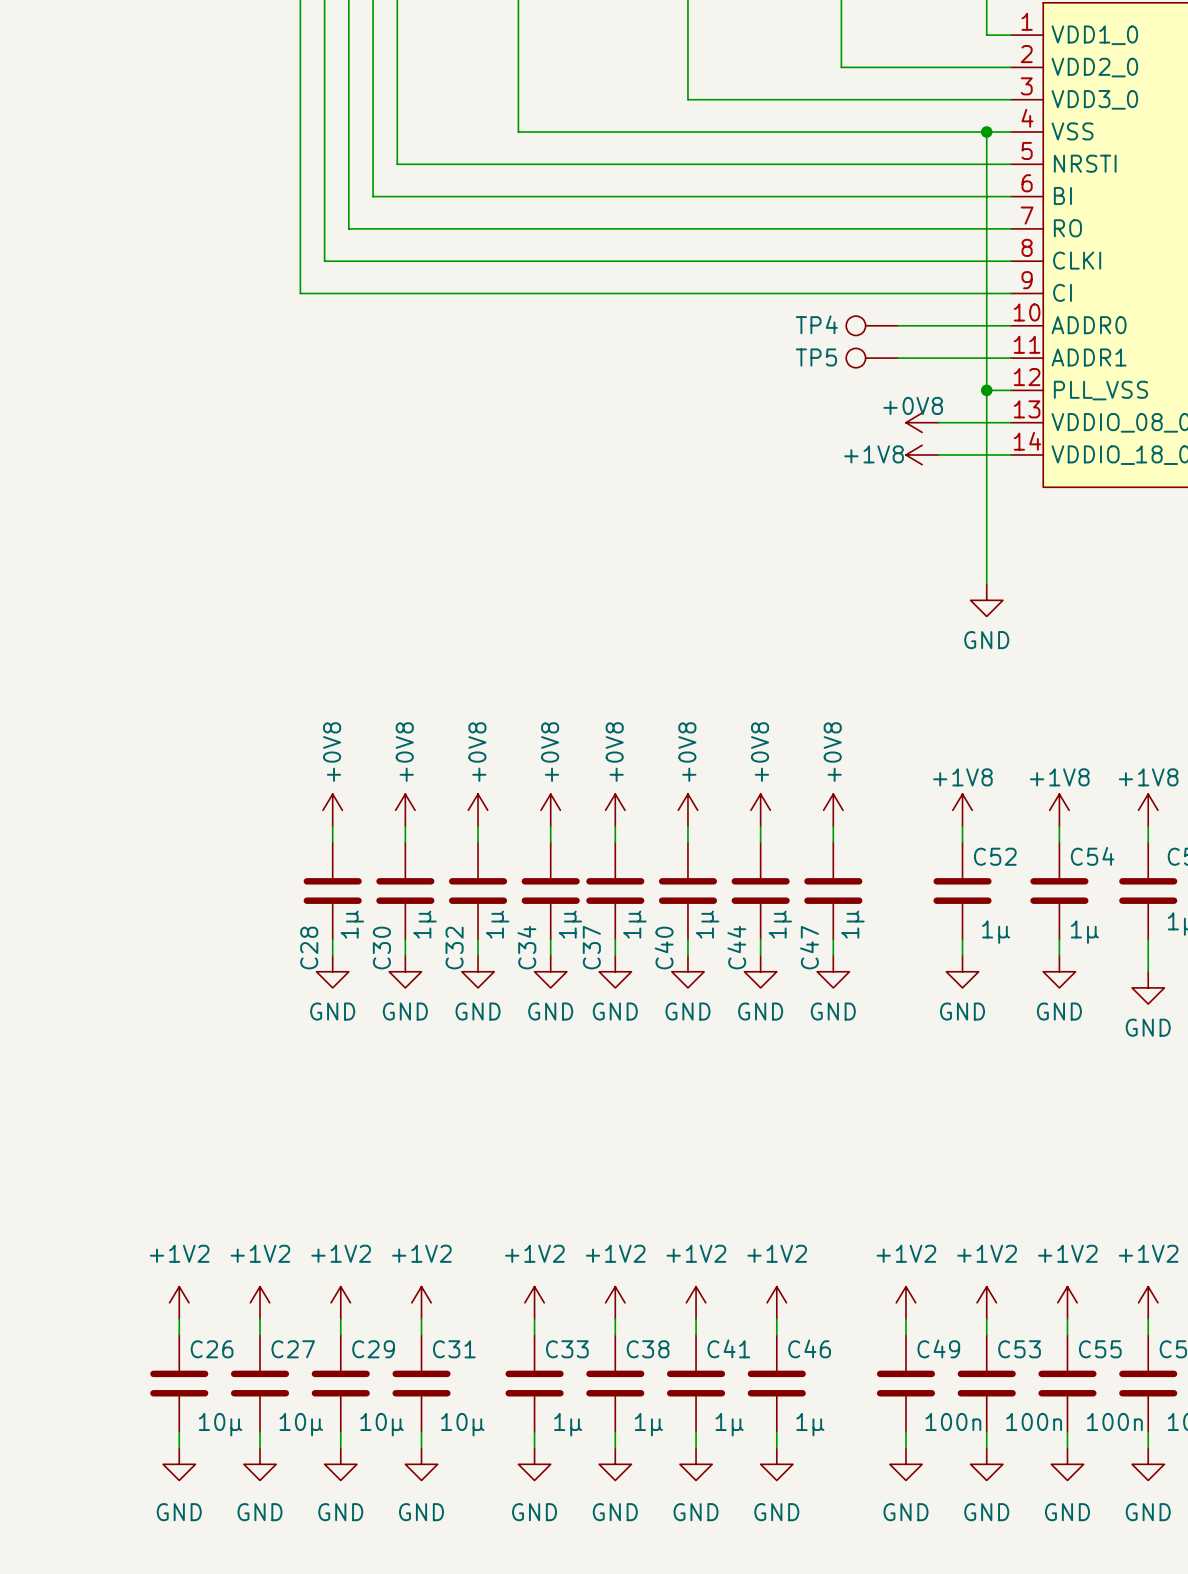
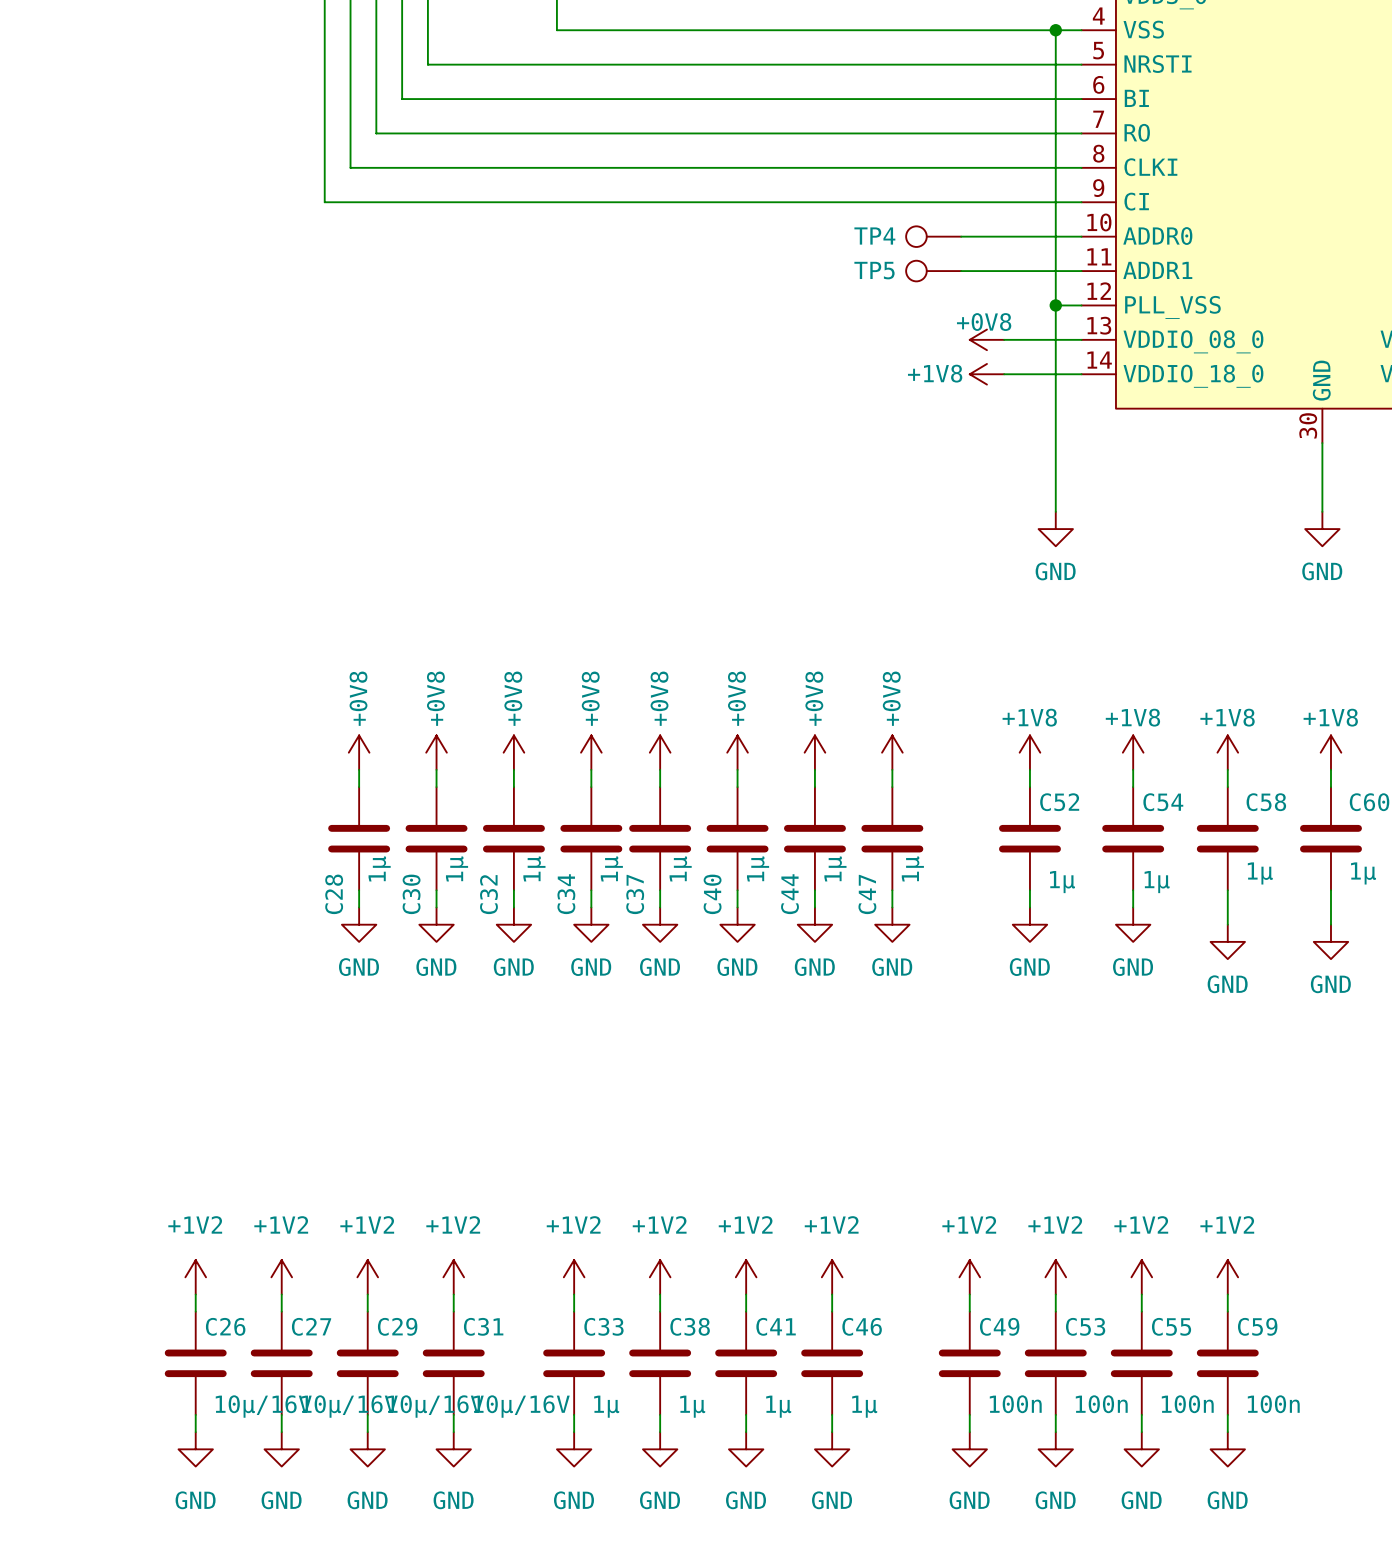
C26 value: 10µ (220, 1424) -> 10µ/16V (263, 1406)
C27 value: 10µ (301, 1424) -> 10µ/16V (349, 1406)
C29 value: 10µ (382, 1424) -> 10µ/16V (435, 1406)
C31 value: 10µ (462, 1424) -> 10µ/16V (521, 1406)

